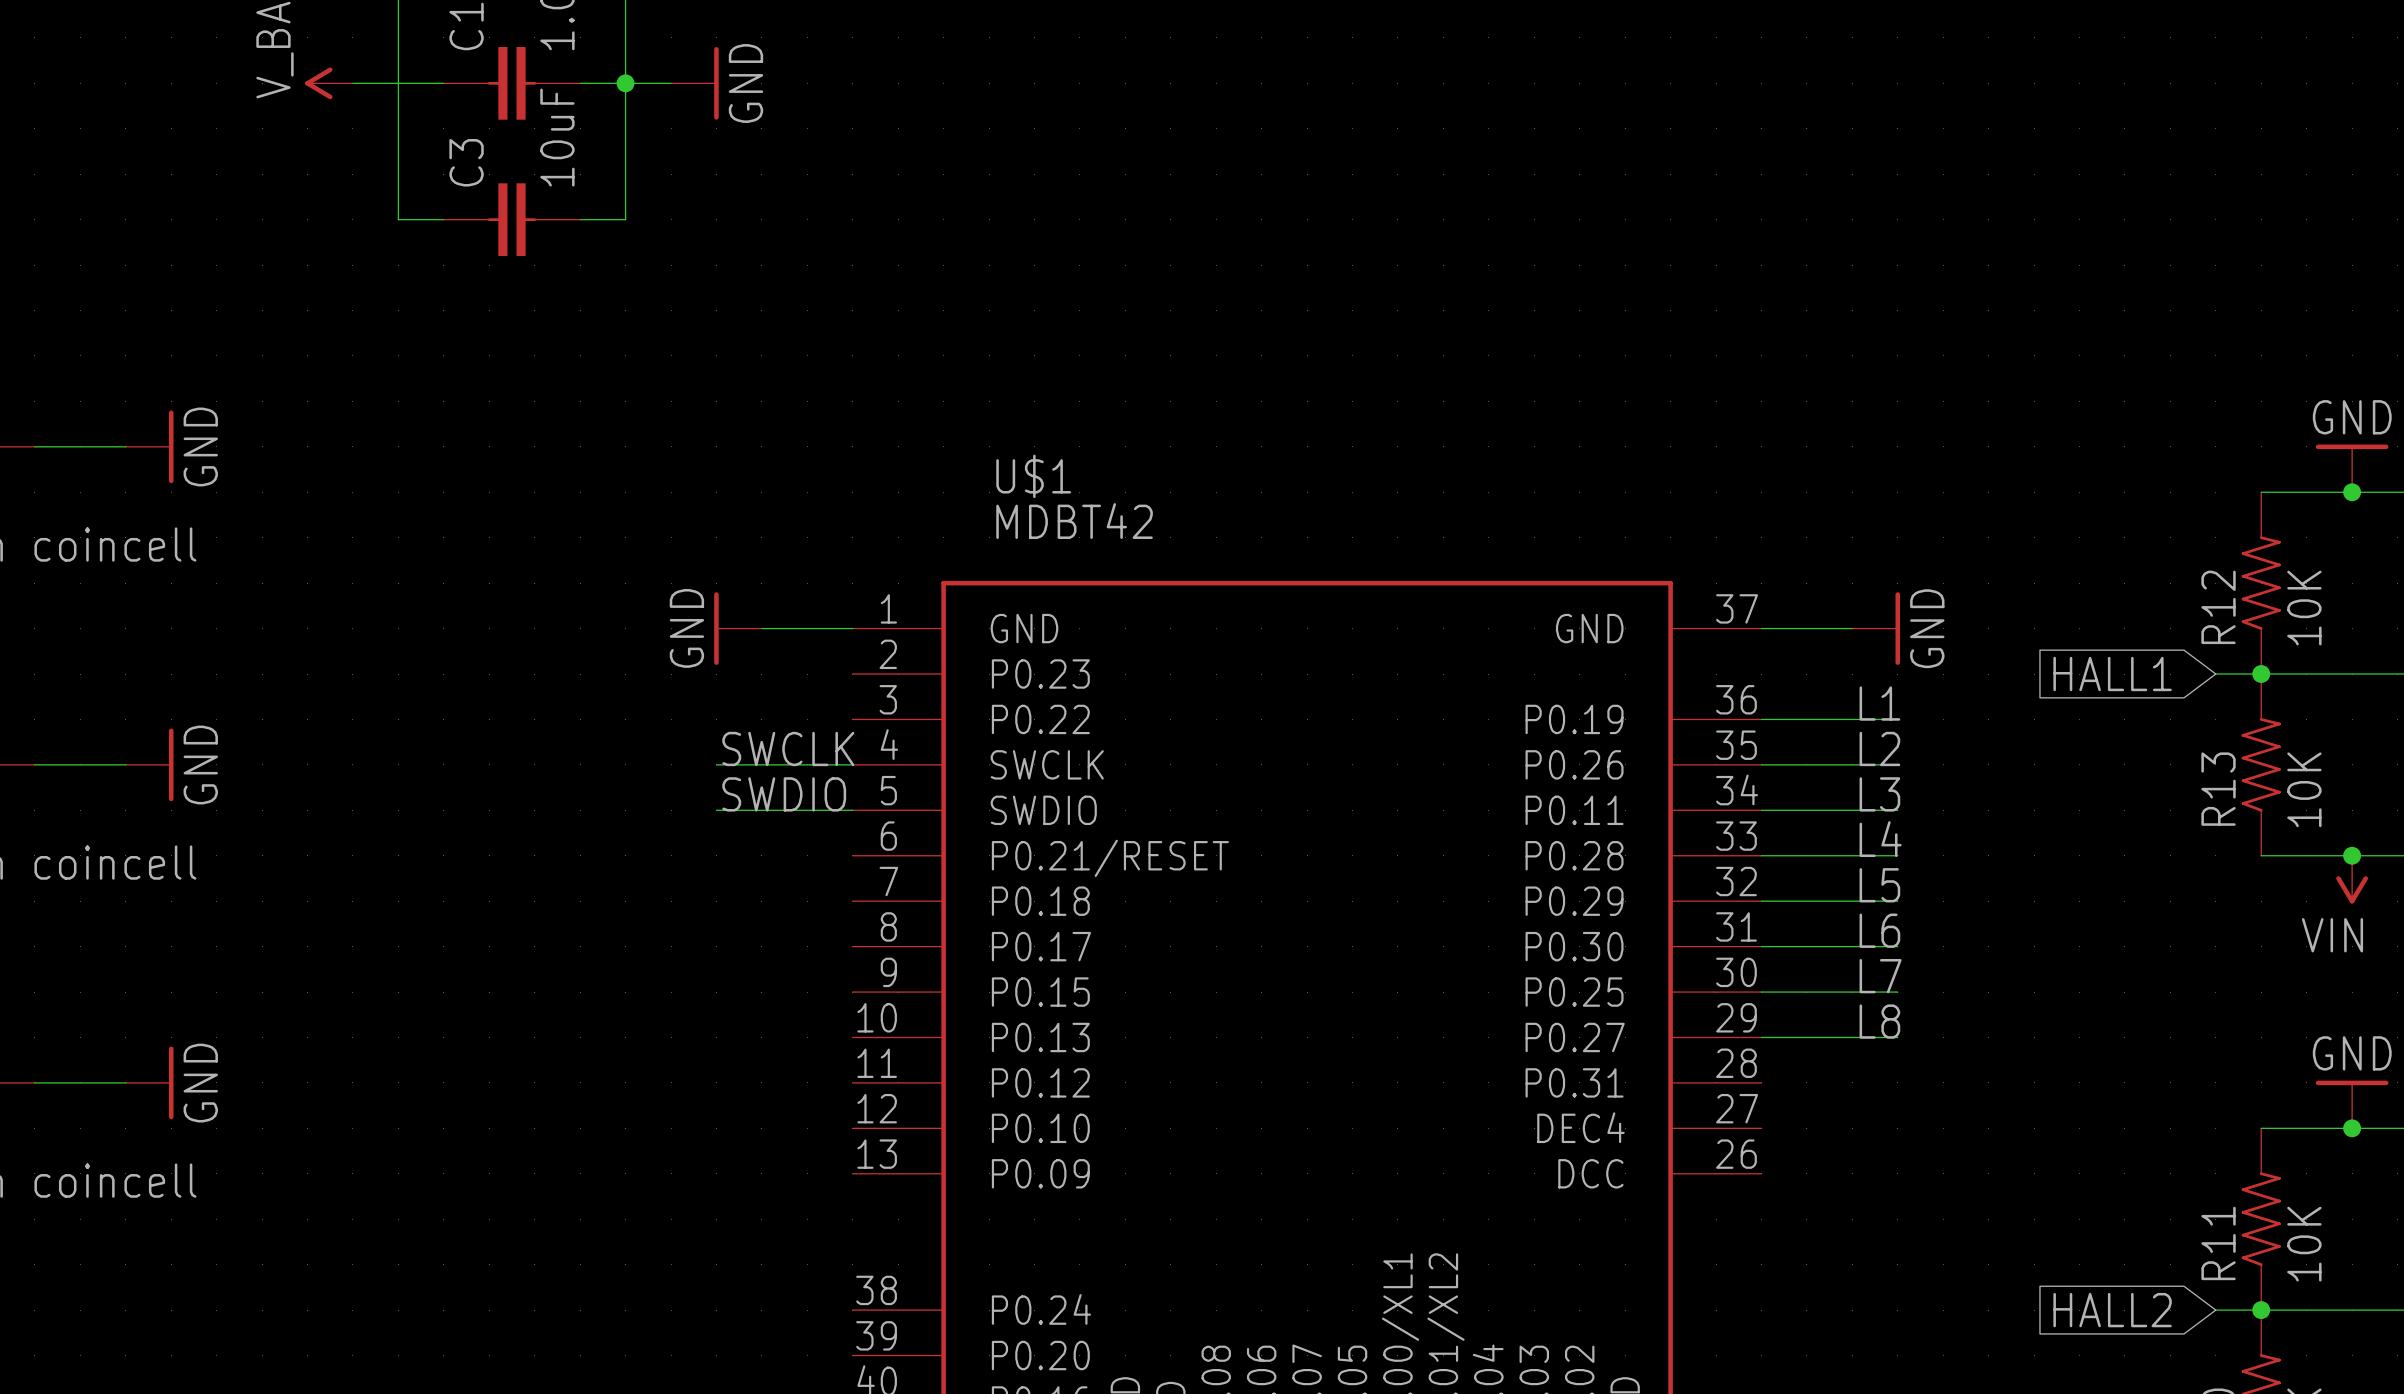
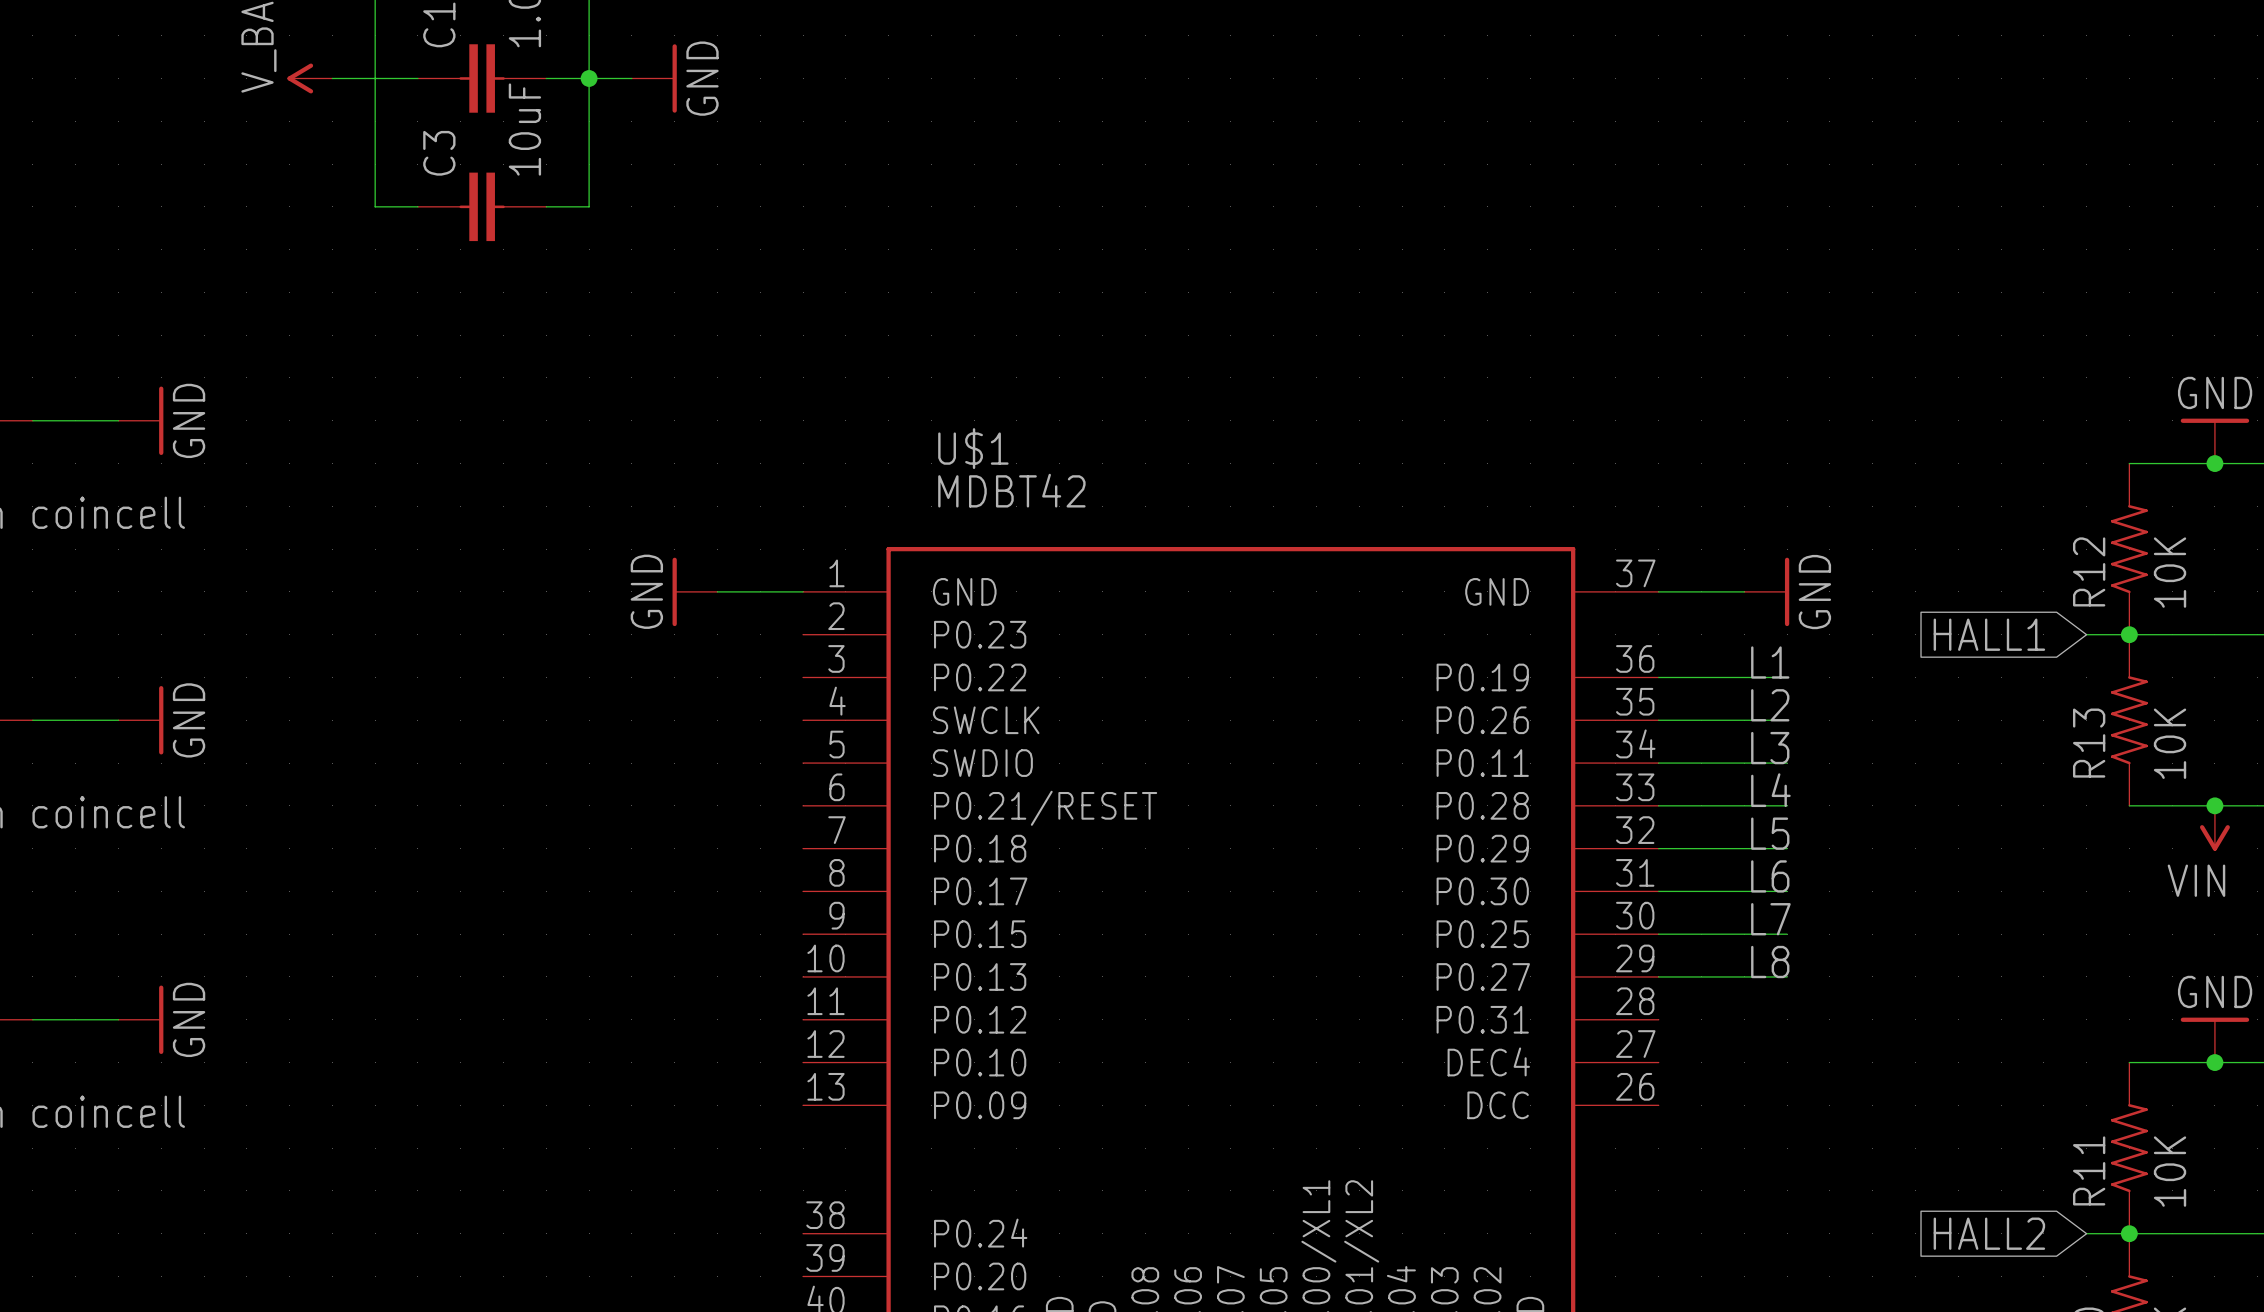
label: SWCLK (788, 748) -> none
wire: (716, 764) (852, 764) -> none
label: SWDIO (784, 794) -> none
wire: (716, 810) (852, 810) -> none

